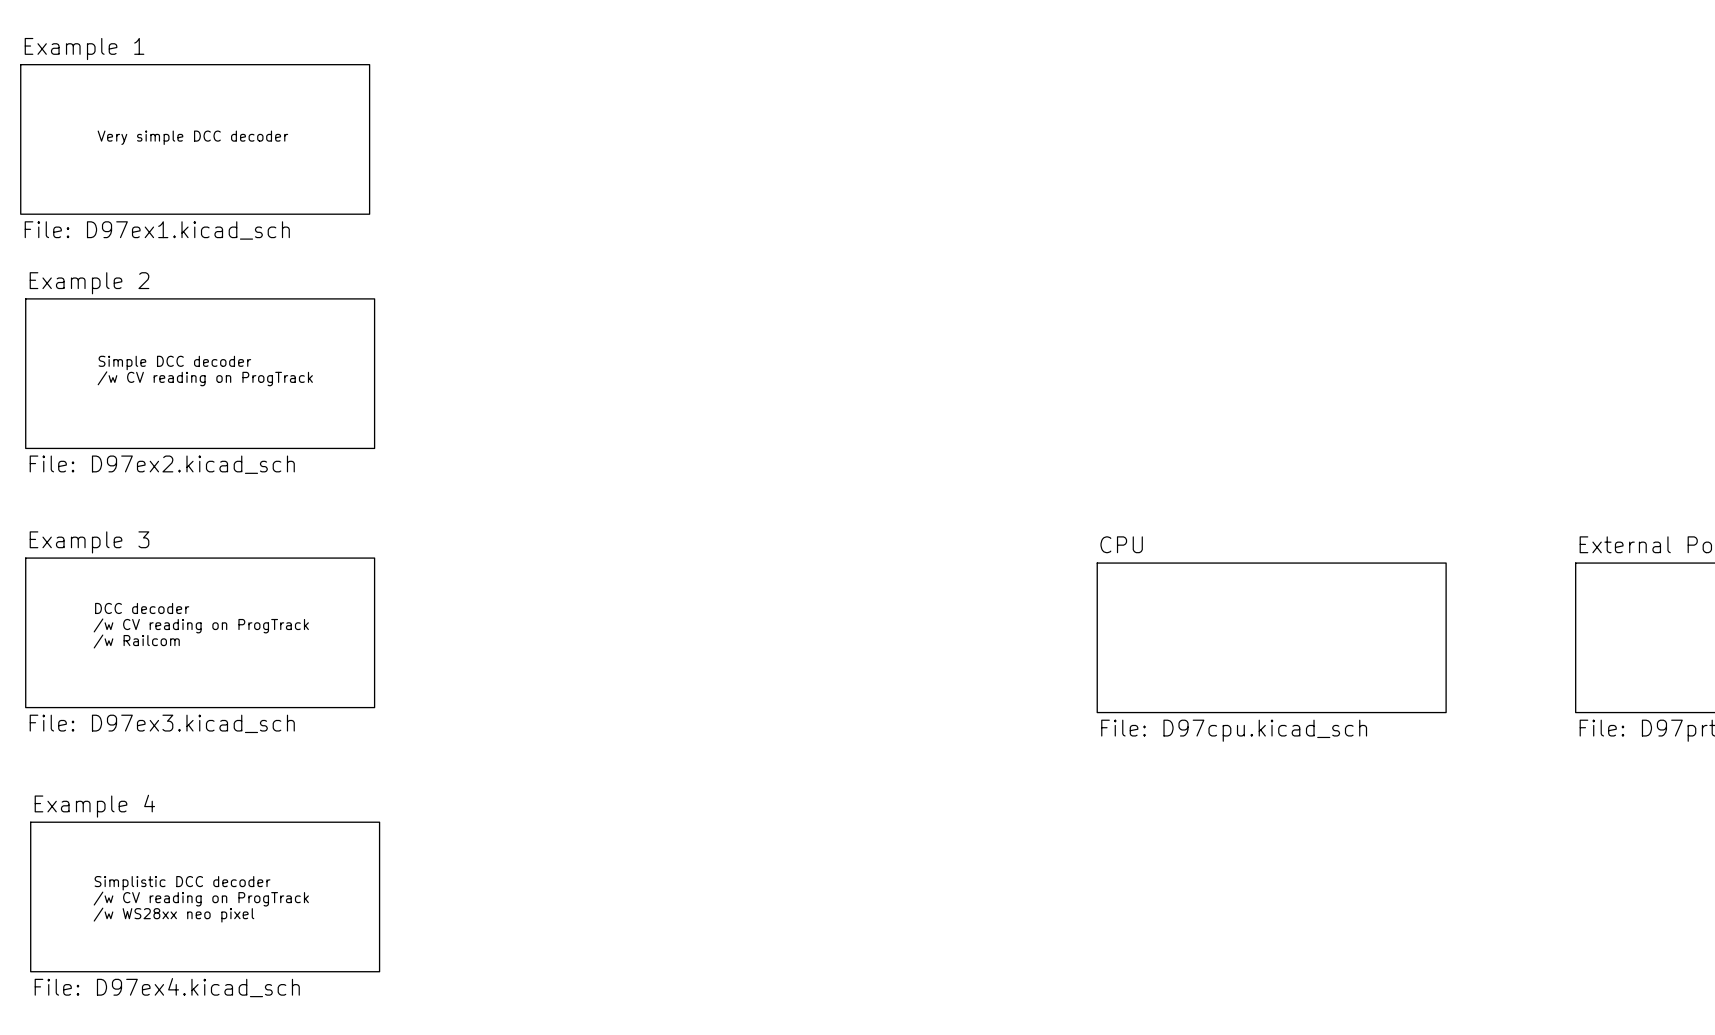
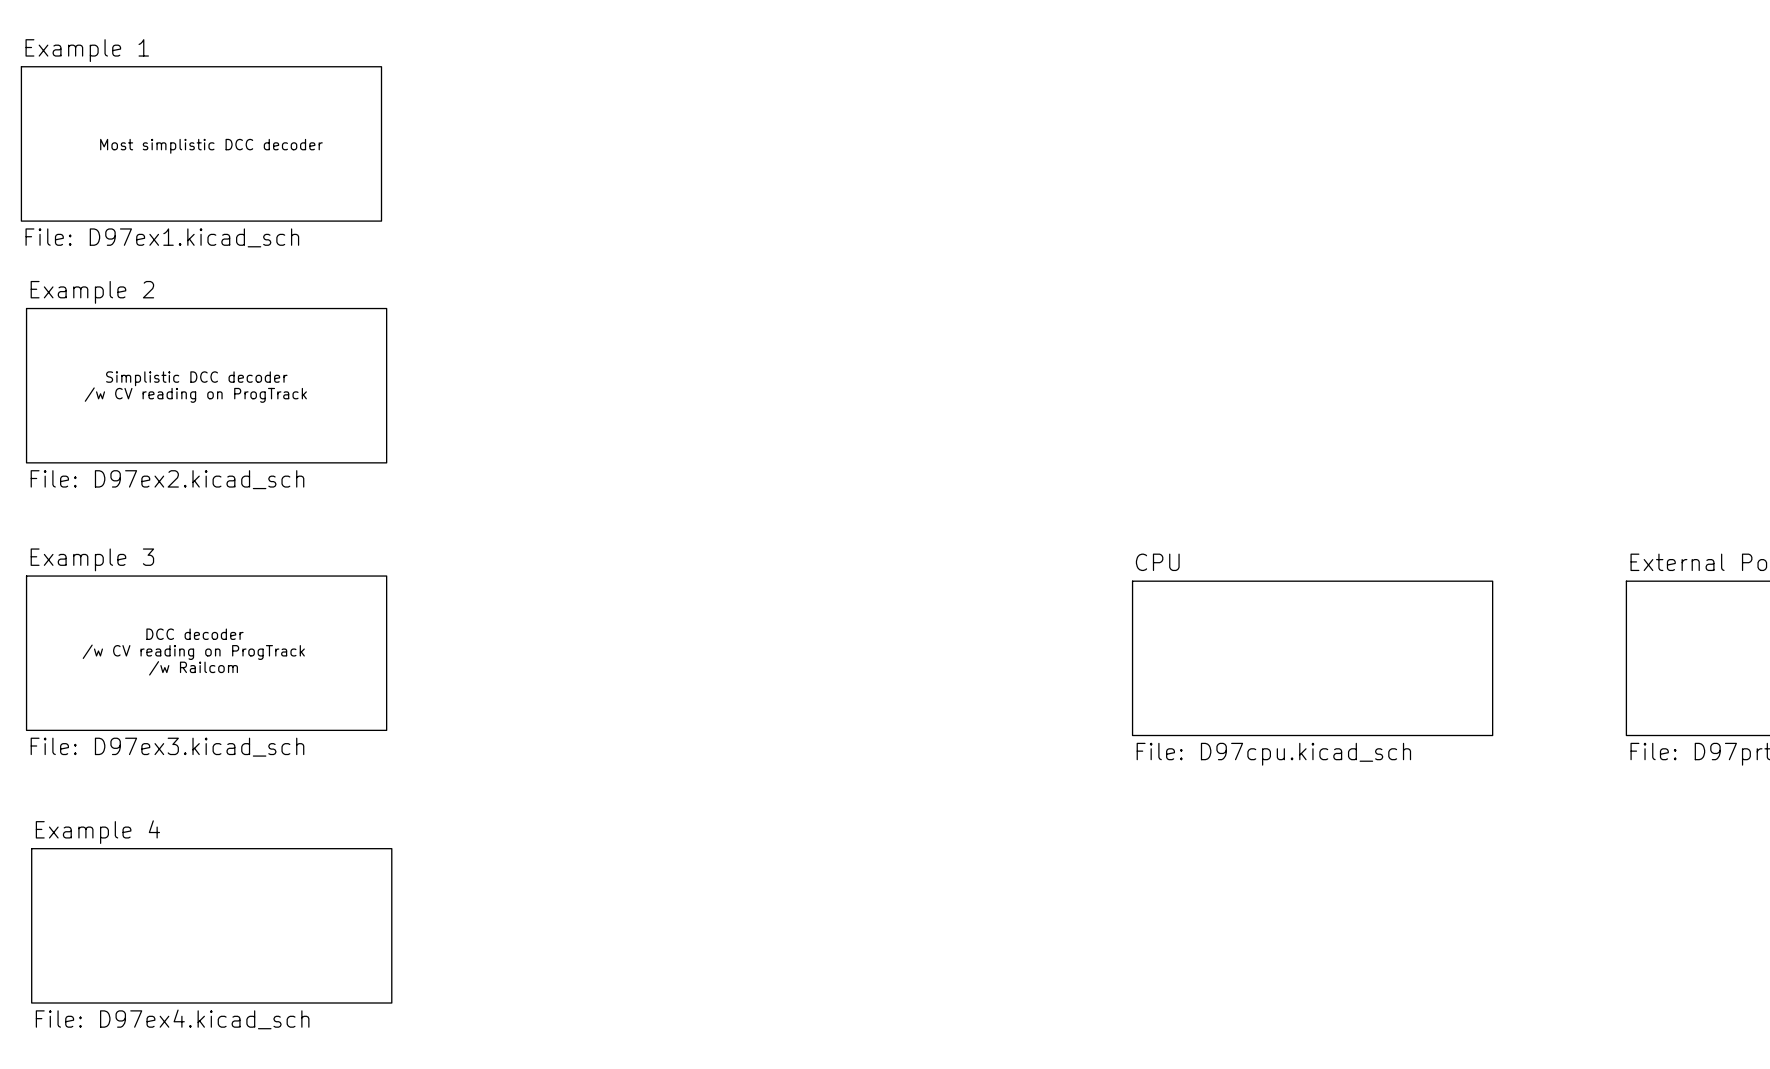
text: Very simple DCC decoder (192, 137) -> Most simplistic DCC decoder (211, 146)
text: Simple DCC decoder (174, 362) -> Simplistic DCC decoder (196, 378)
text position: /w CV reading on ProgTrack (205, 378) -> /w CV reading on ProgTrack (195, 395)
text position: DCC decoder (142, 608) -> DCC decoder (194, 634)
text position: /w CV reading on ProgTrack (201, 625) -> /w CV reading on ProgTrack (193, 652)
text position: /w Railcom (136, 641) -> /w Railcom (193, 668)
text: Simplistic DCC decoder (182, 883) -> none
text: /w CV reading on ProgTrack (201, 899) -> none
text: /w WS28xx neo pixel (173, 915) -> none

